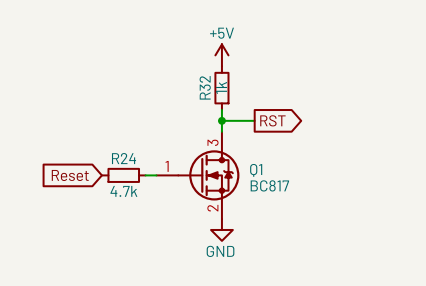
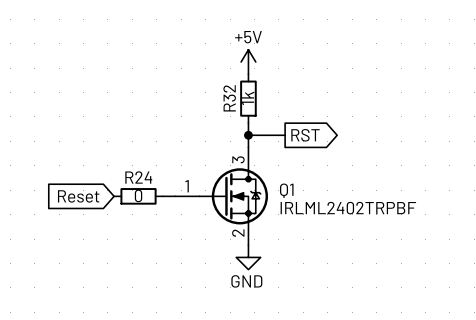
Q1 value: BC817 (269, 185) -> IRLML2402TRPBF (348, 208)
R24 value: 4.7k (123, 191) -> 0 (138, 195)

